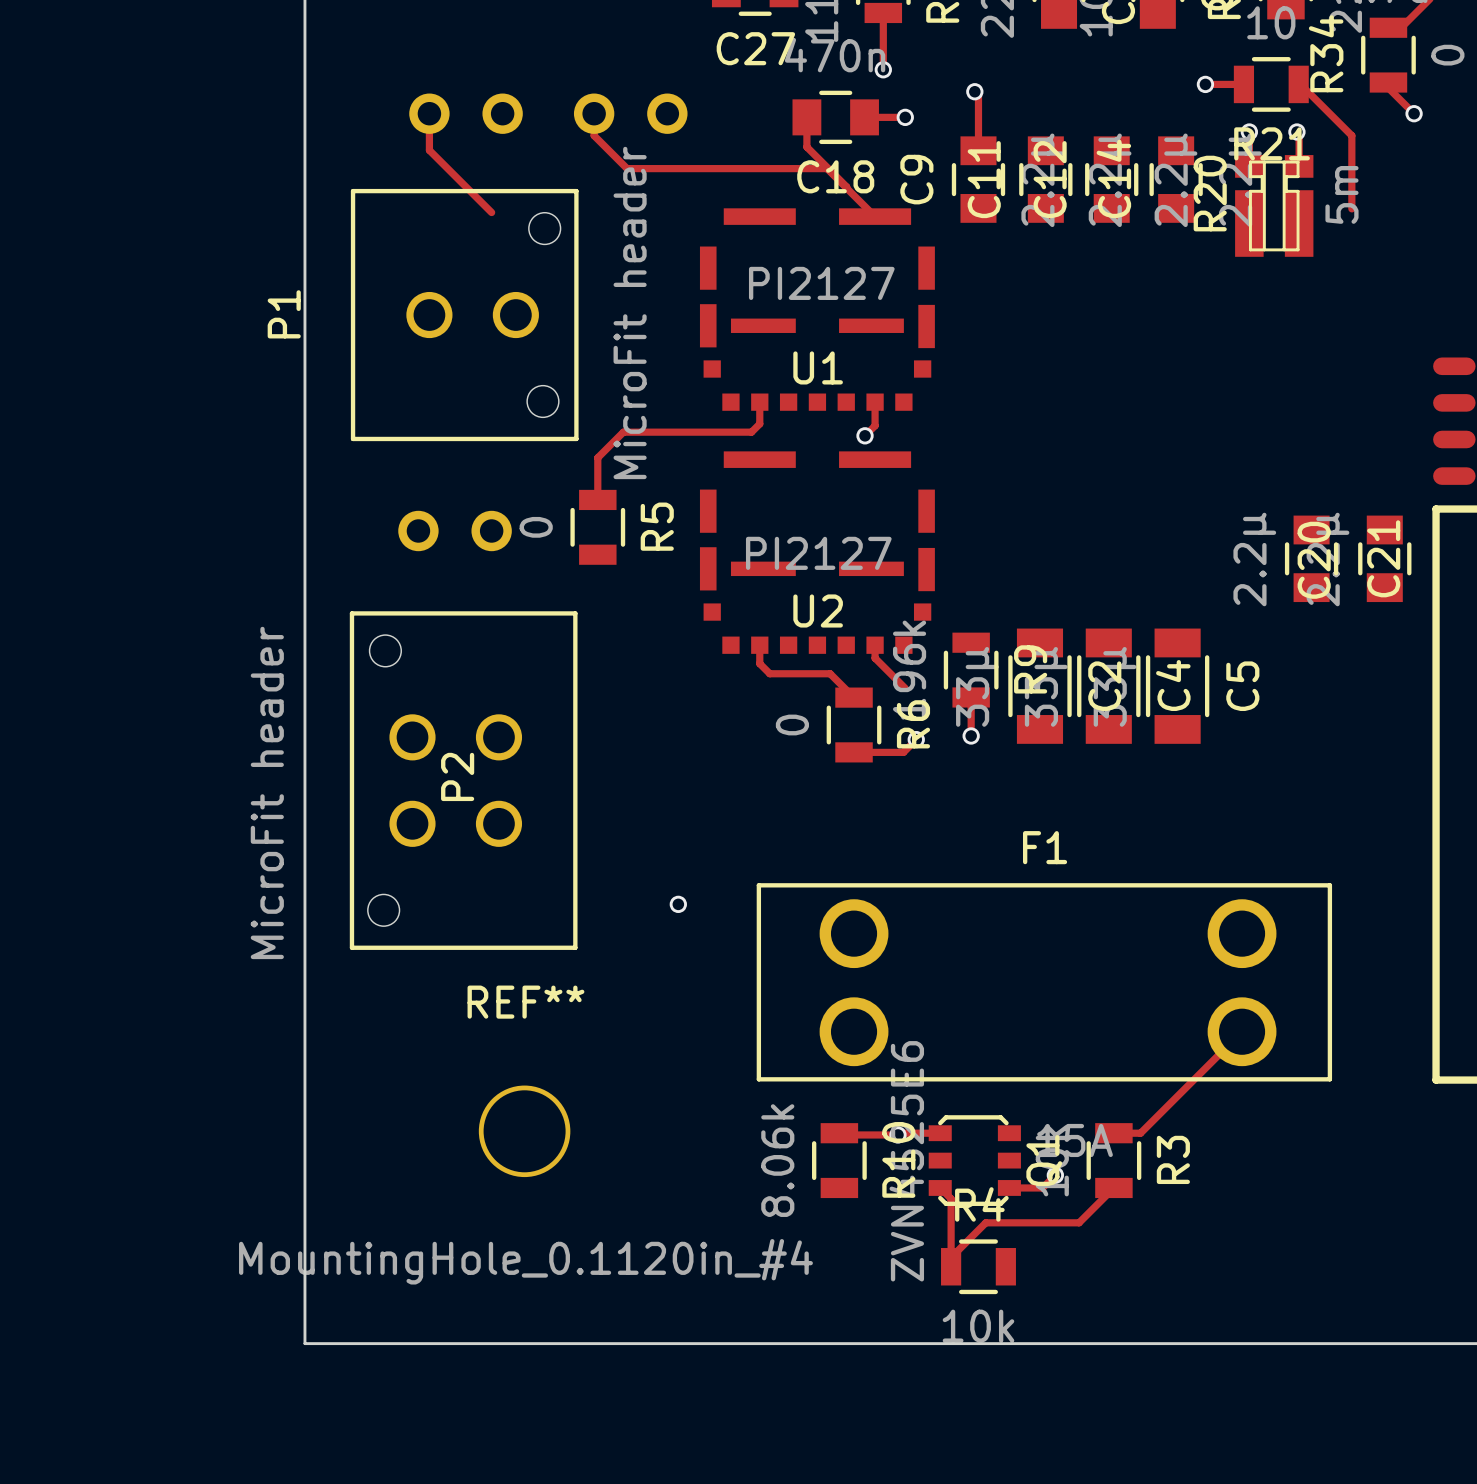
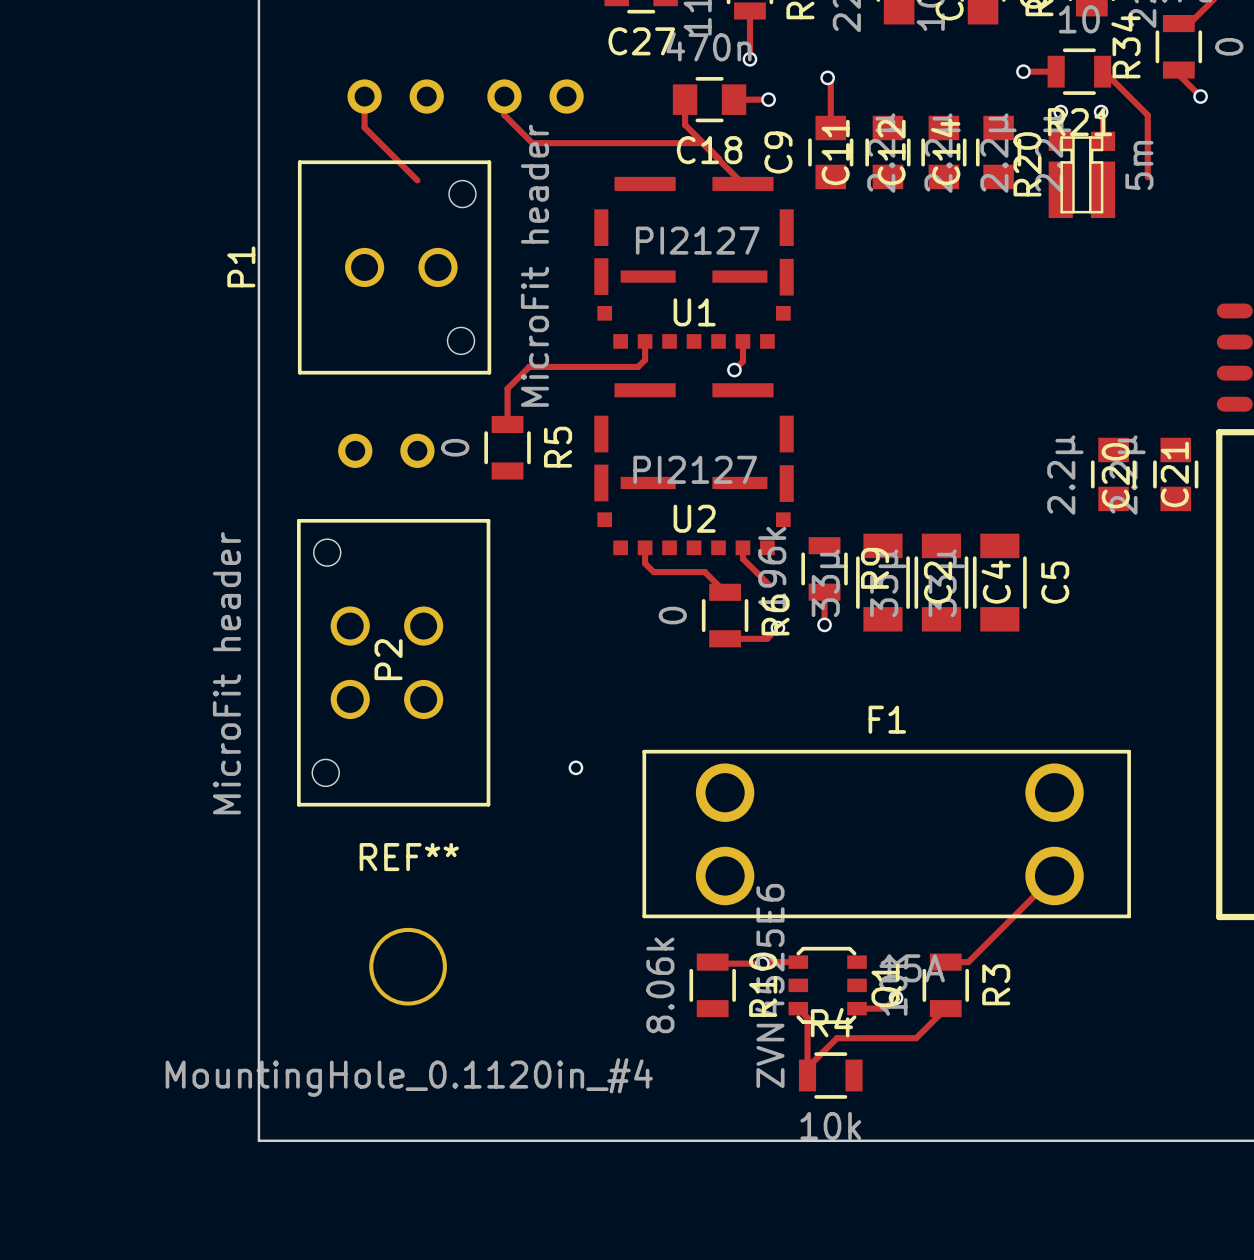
REF** position: (524, 1131) -> (408, 966)

